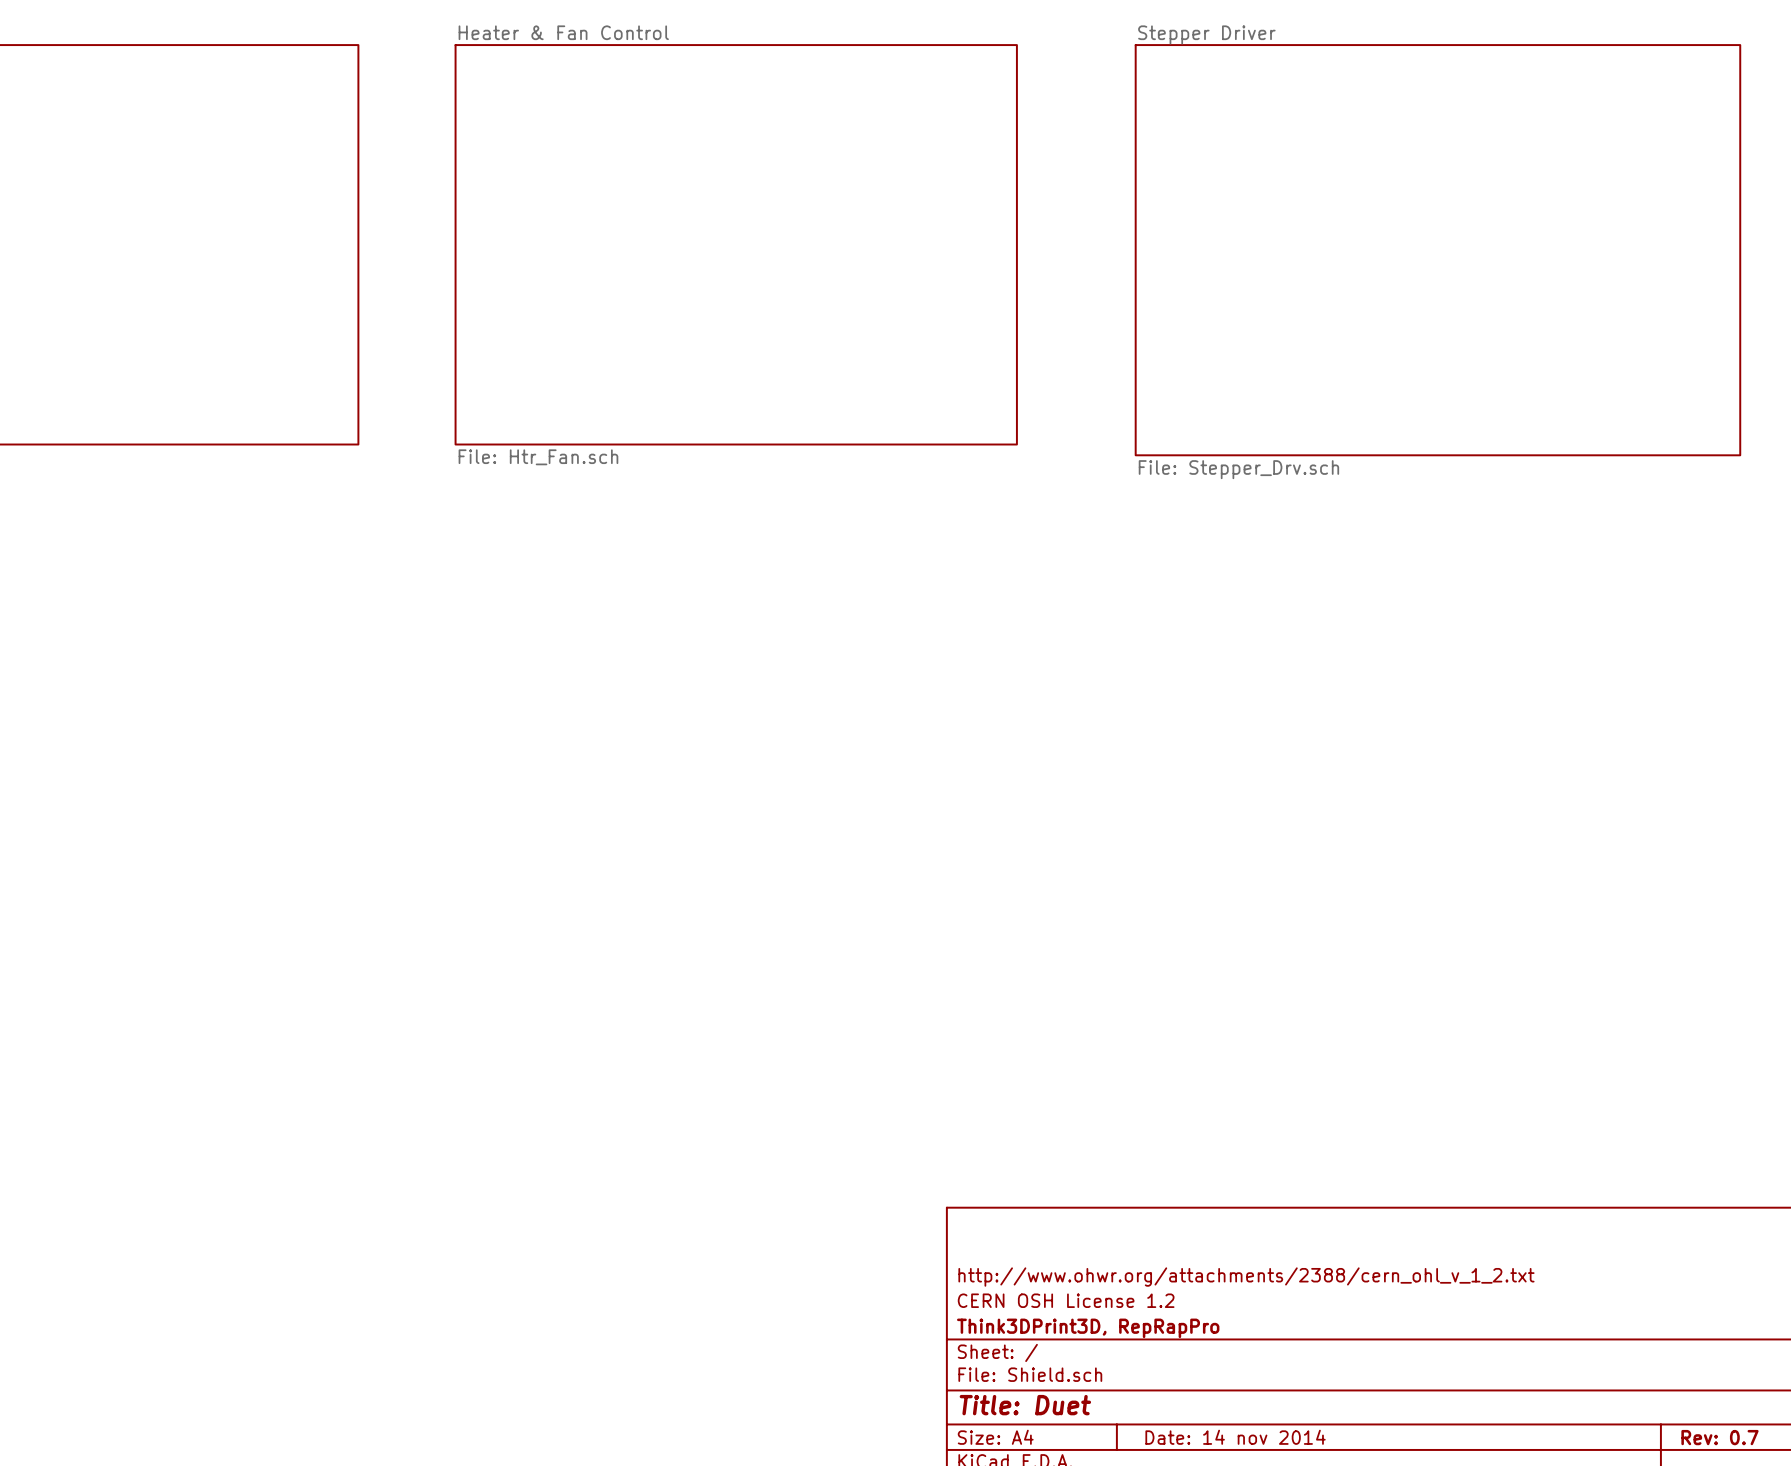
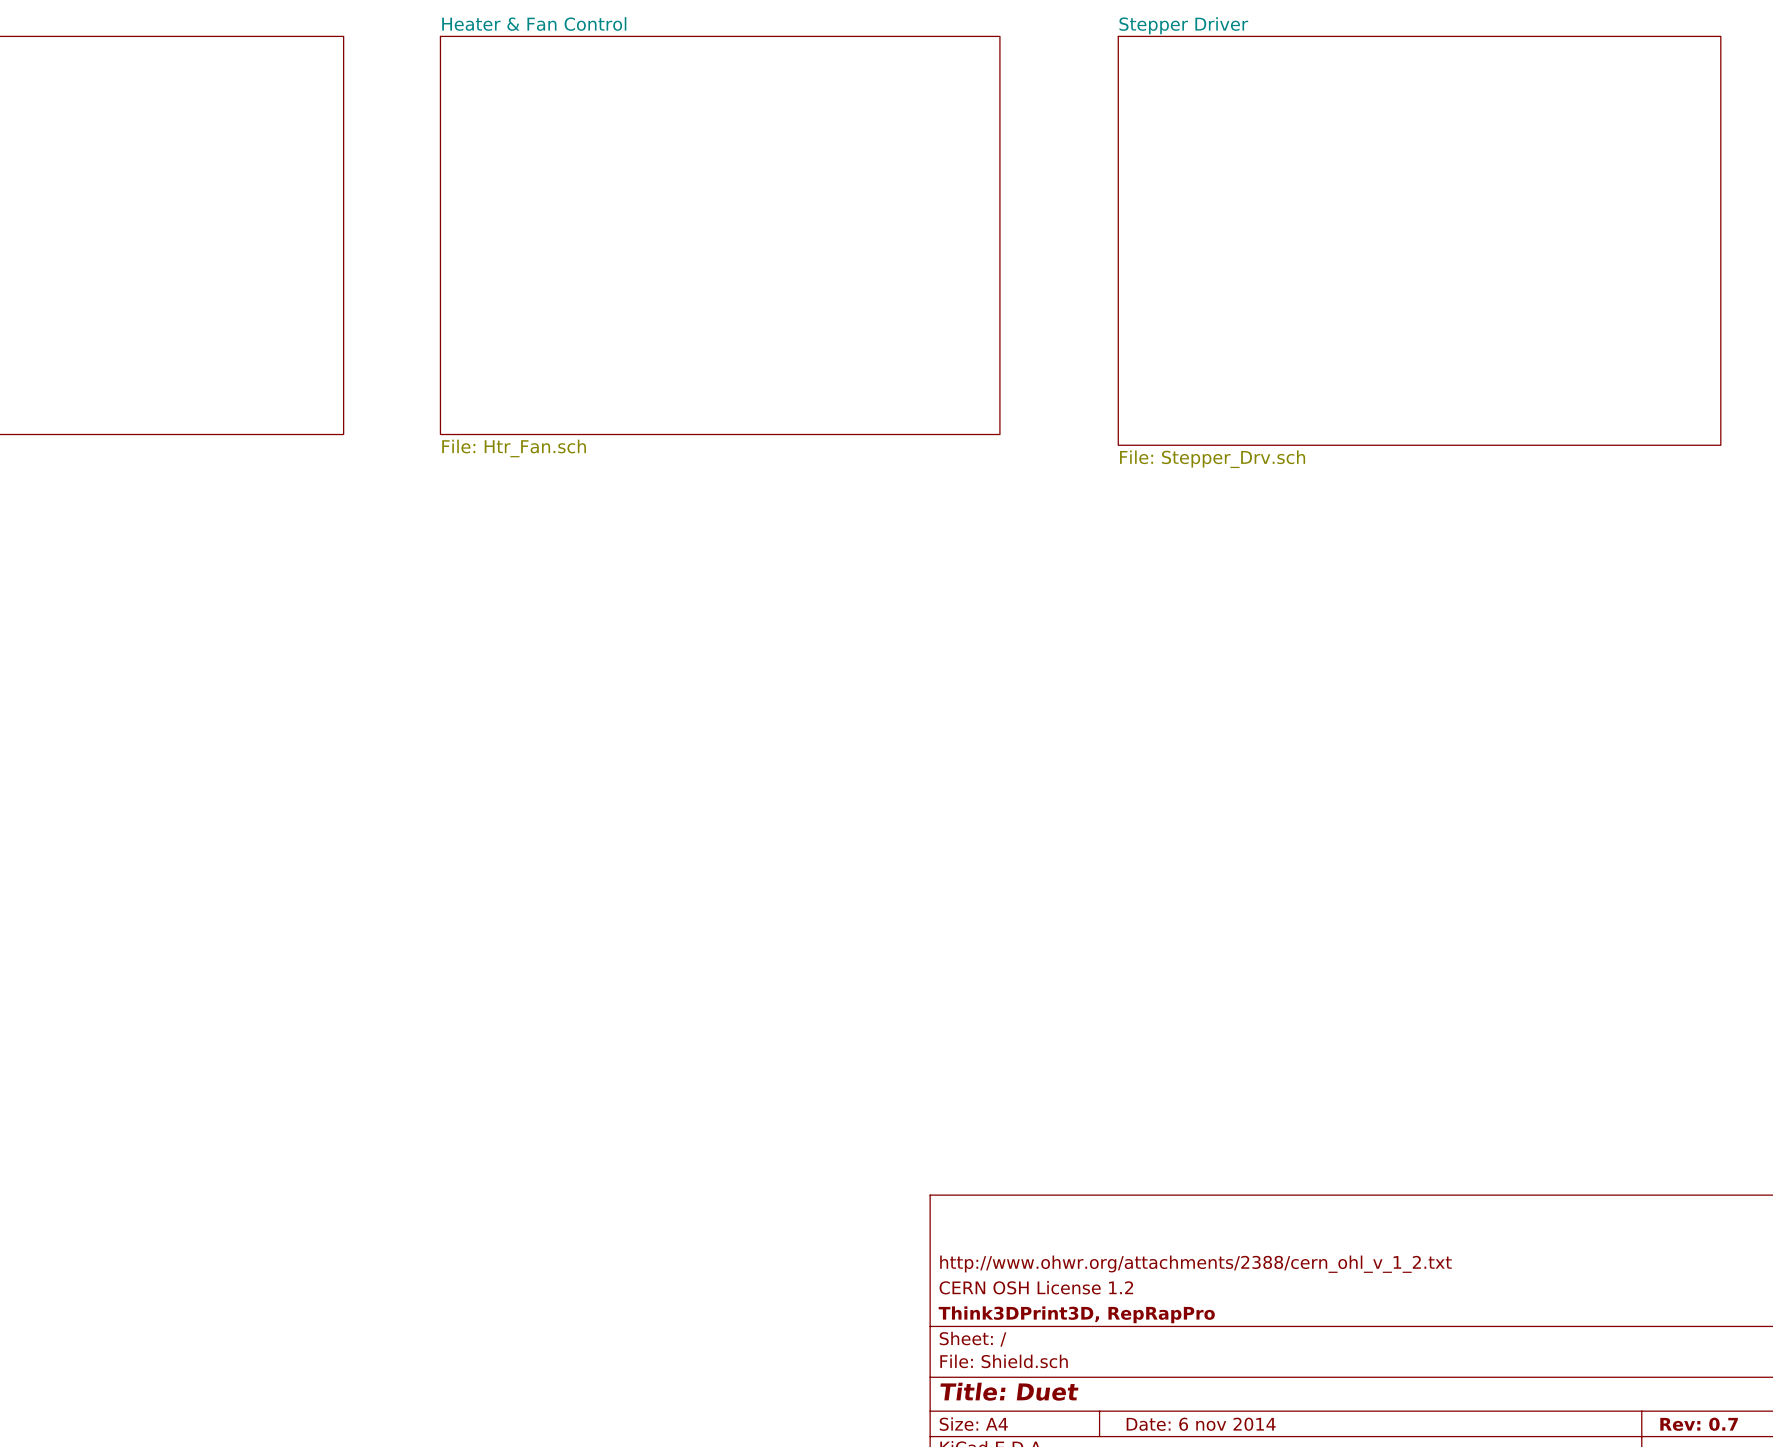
title block: Date: 14 nov 2014 (1235, 1437) -> Date: 6 nov 2014 (1201, 1424)

